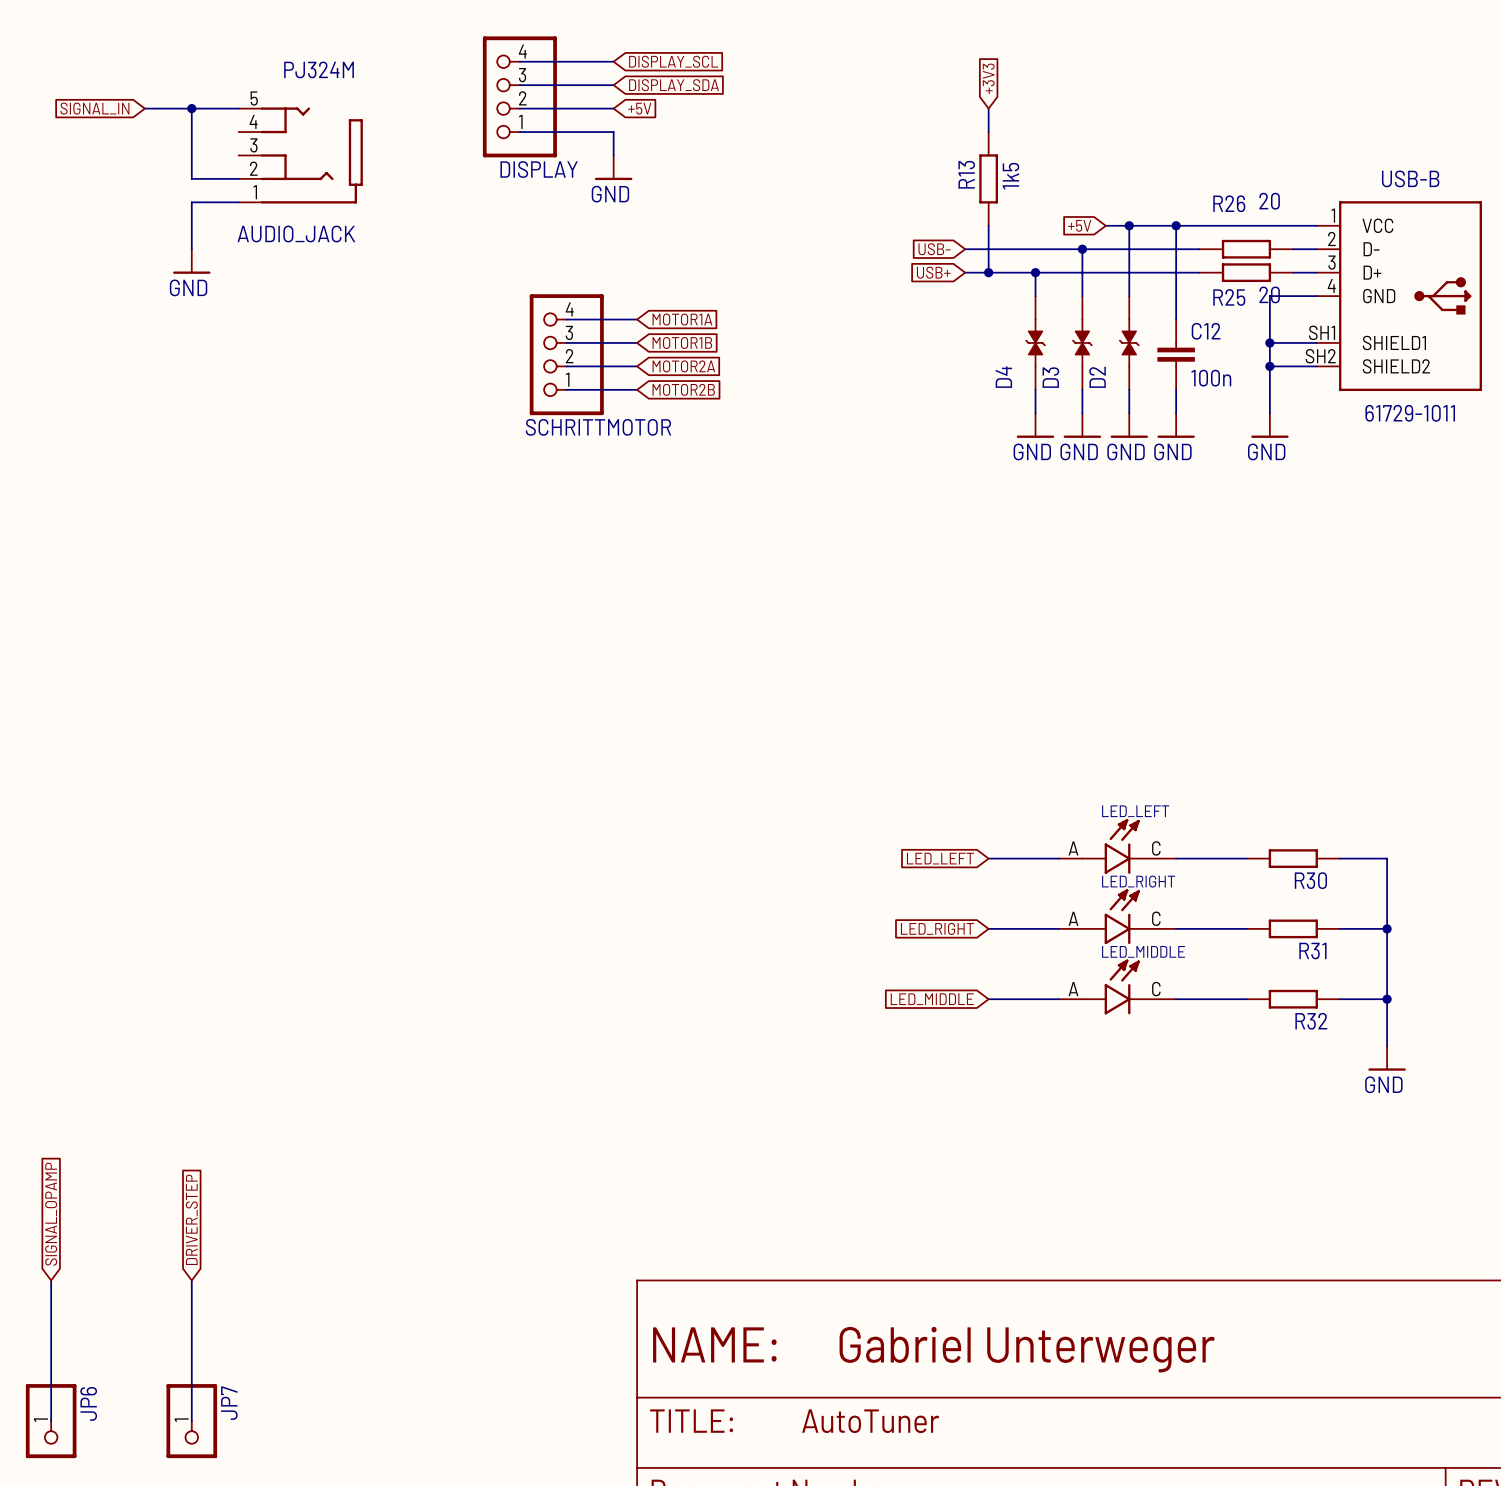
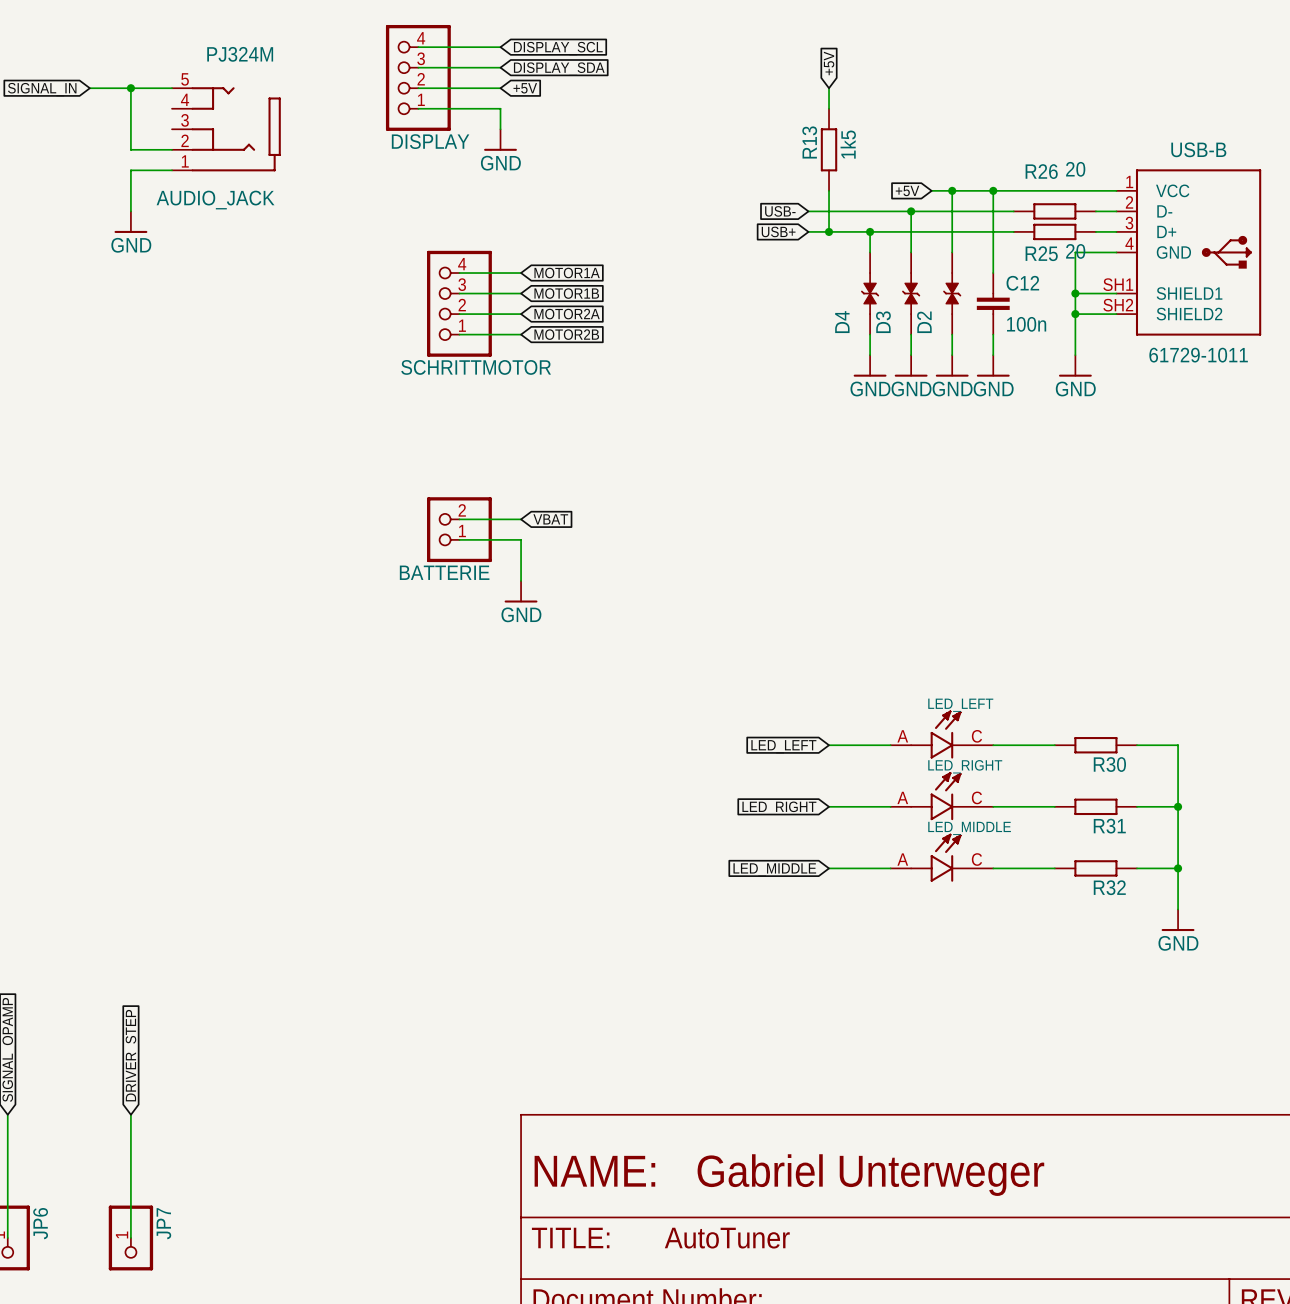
global label: +3V3 (988, 78) -> +5V (829, 63)
wire: none -> (459, 519) (521, 519)
global label: none -> VBAT (550, 519)
BATTERIE: none -> (459, 529)
wire: none -> (459, 539) (521, 539) (521, 580)
power symbol: none -> GND (521, 591)

